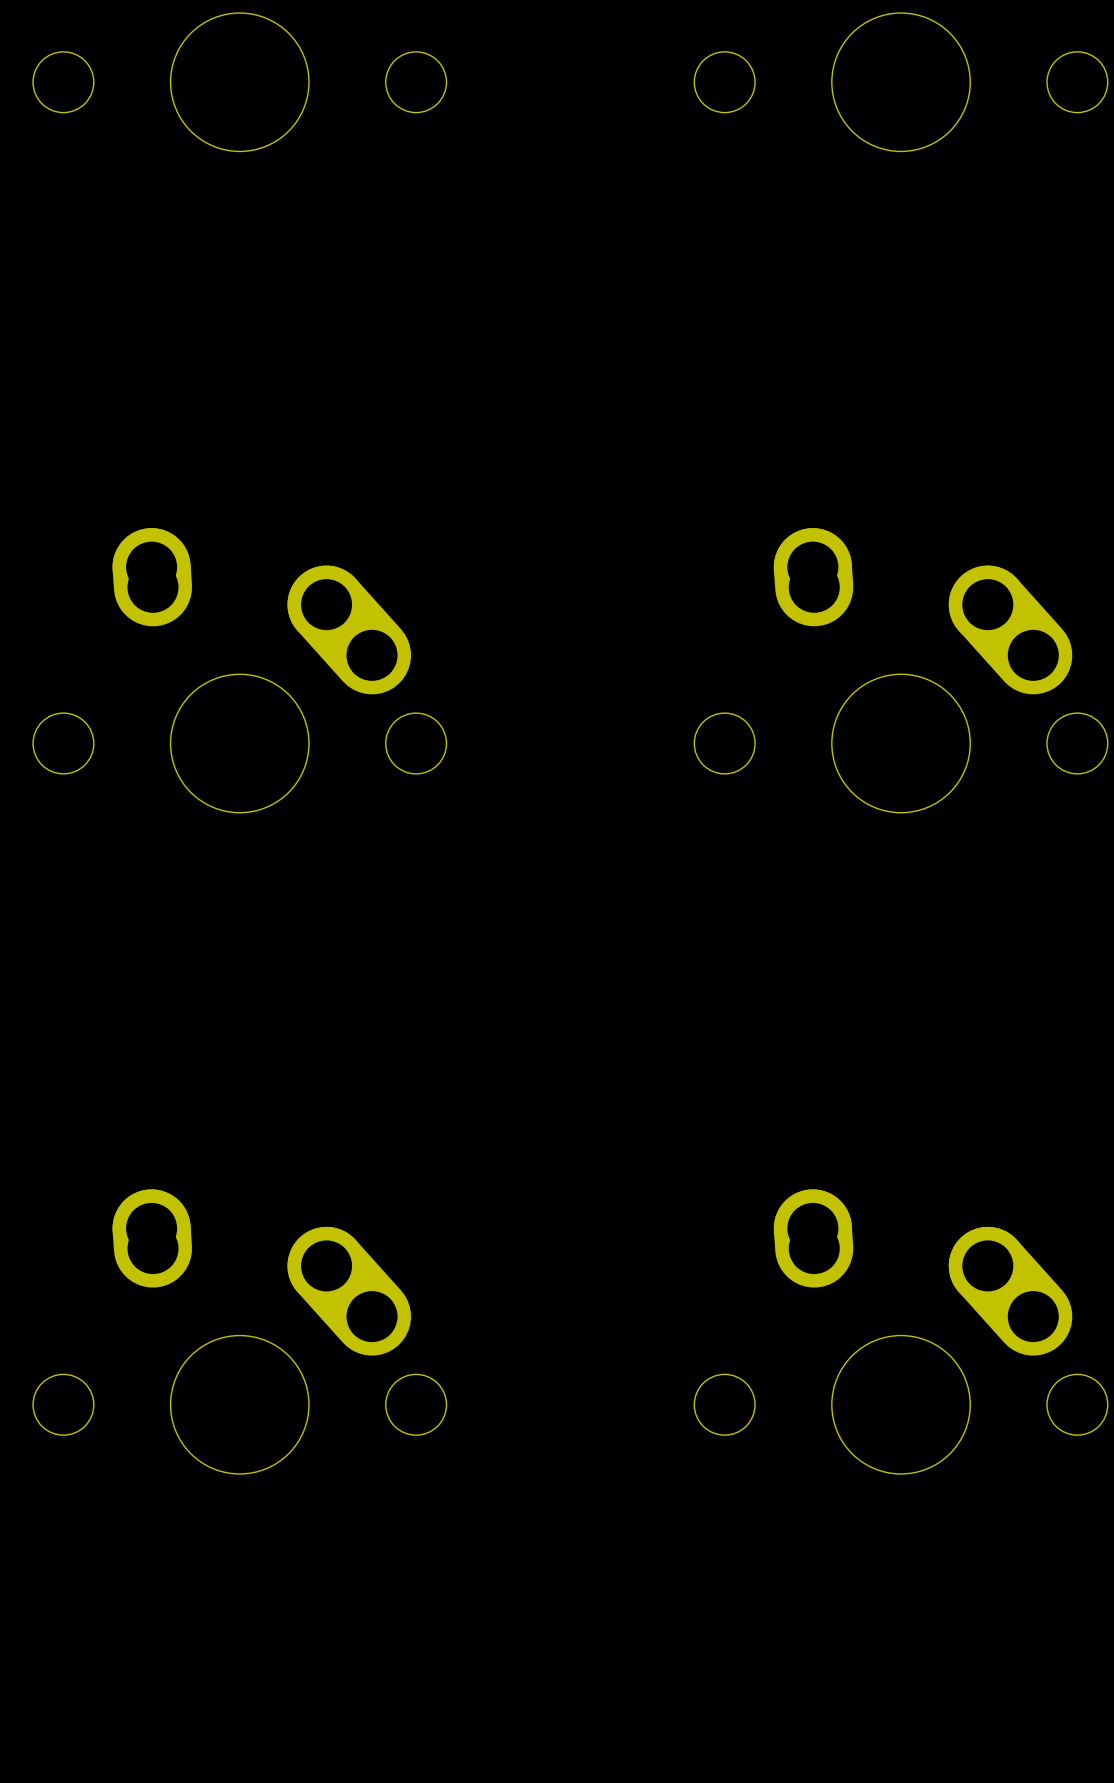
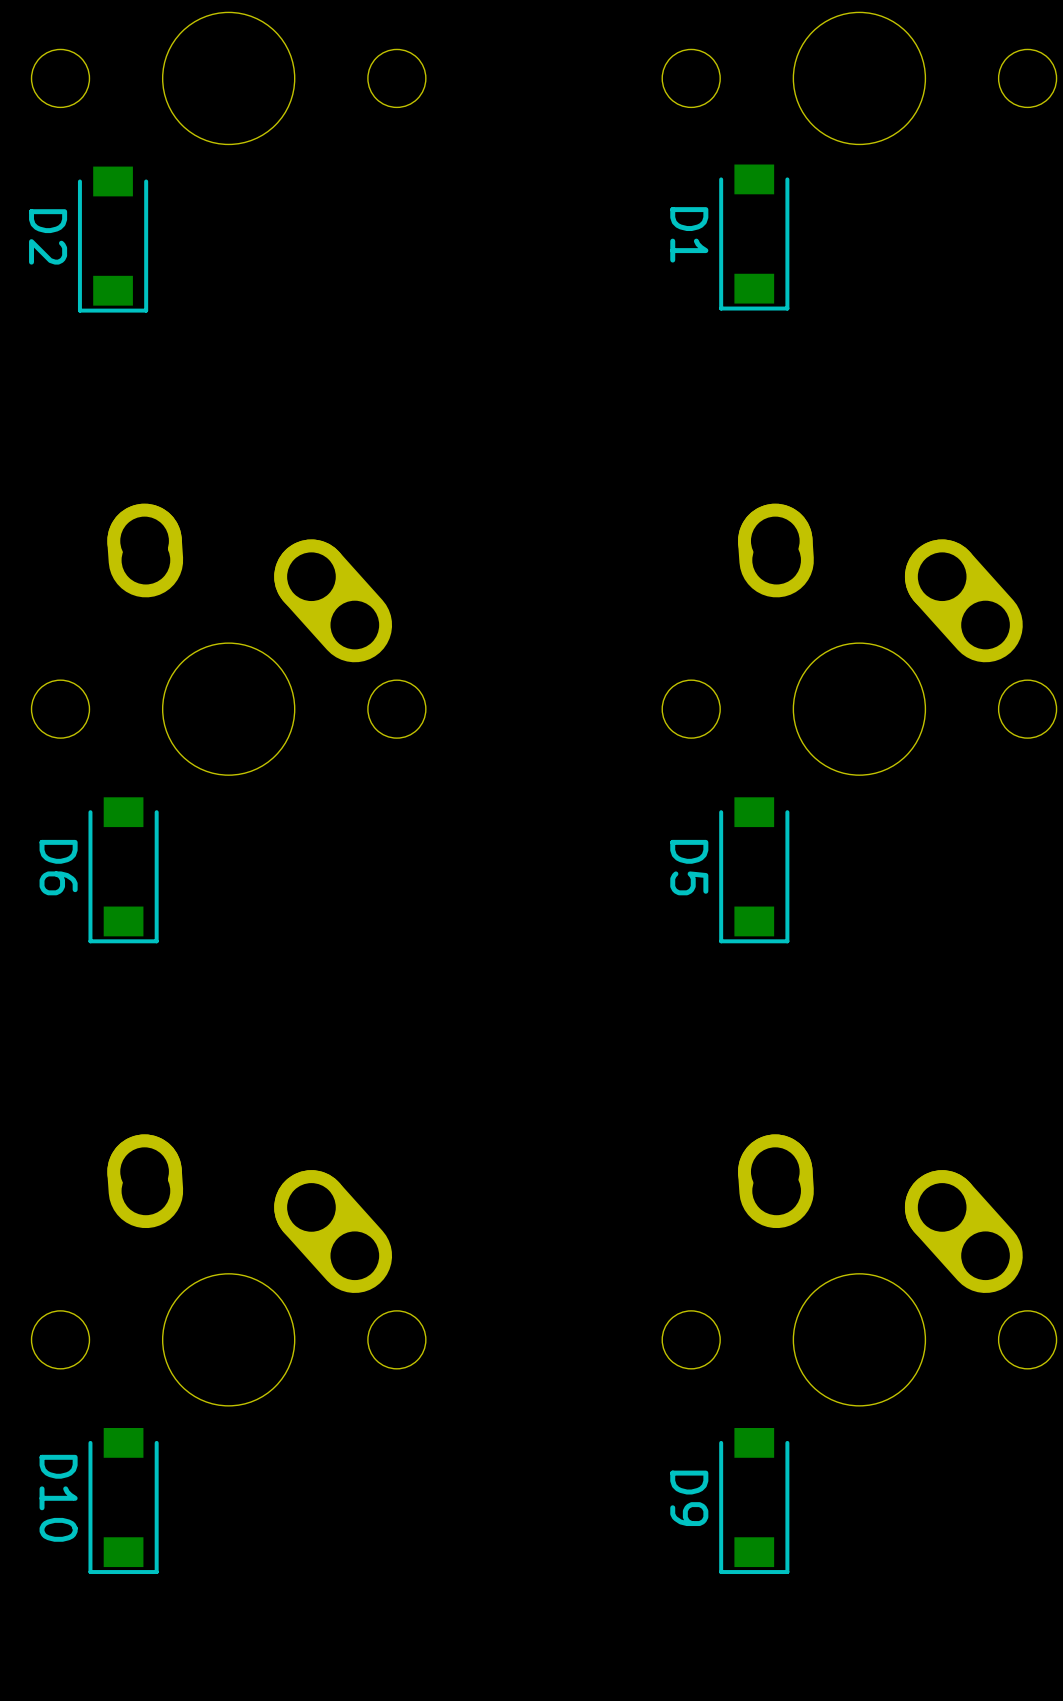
D1: none -> (754, 237)
D2: none -> (113, 239)
D6: none -> (123, 870)
D5: none -> (754, 870)
D10: none -> (123, 1501)
D9: none -> (754, 1501)

